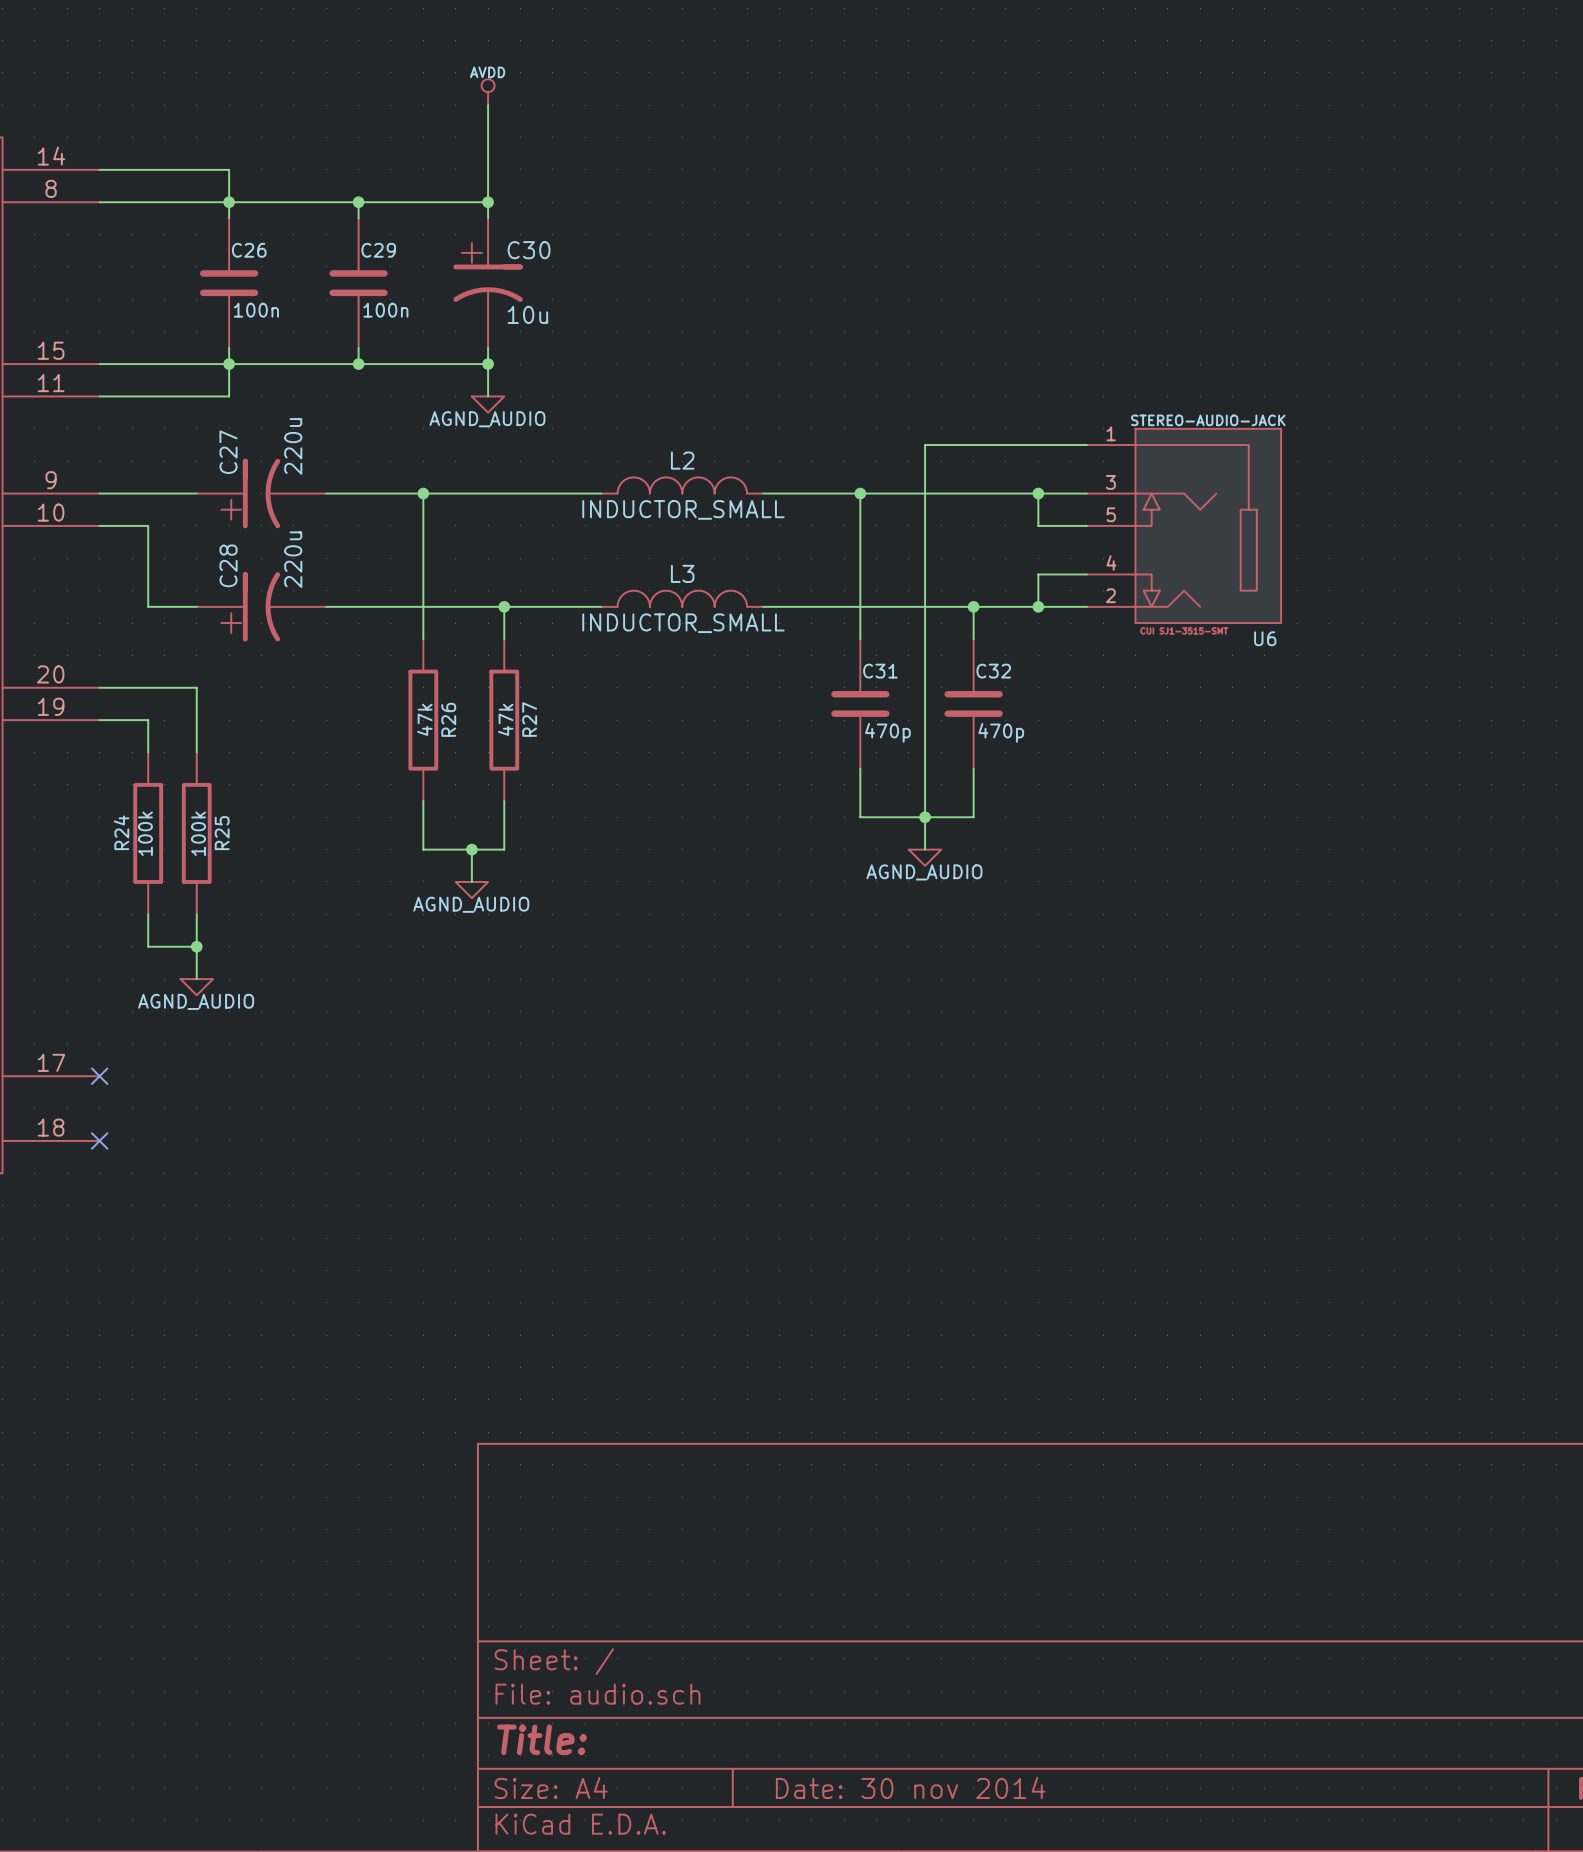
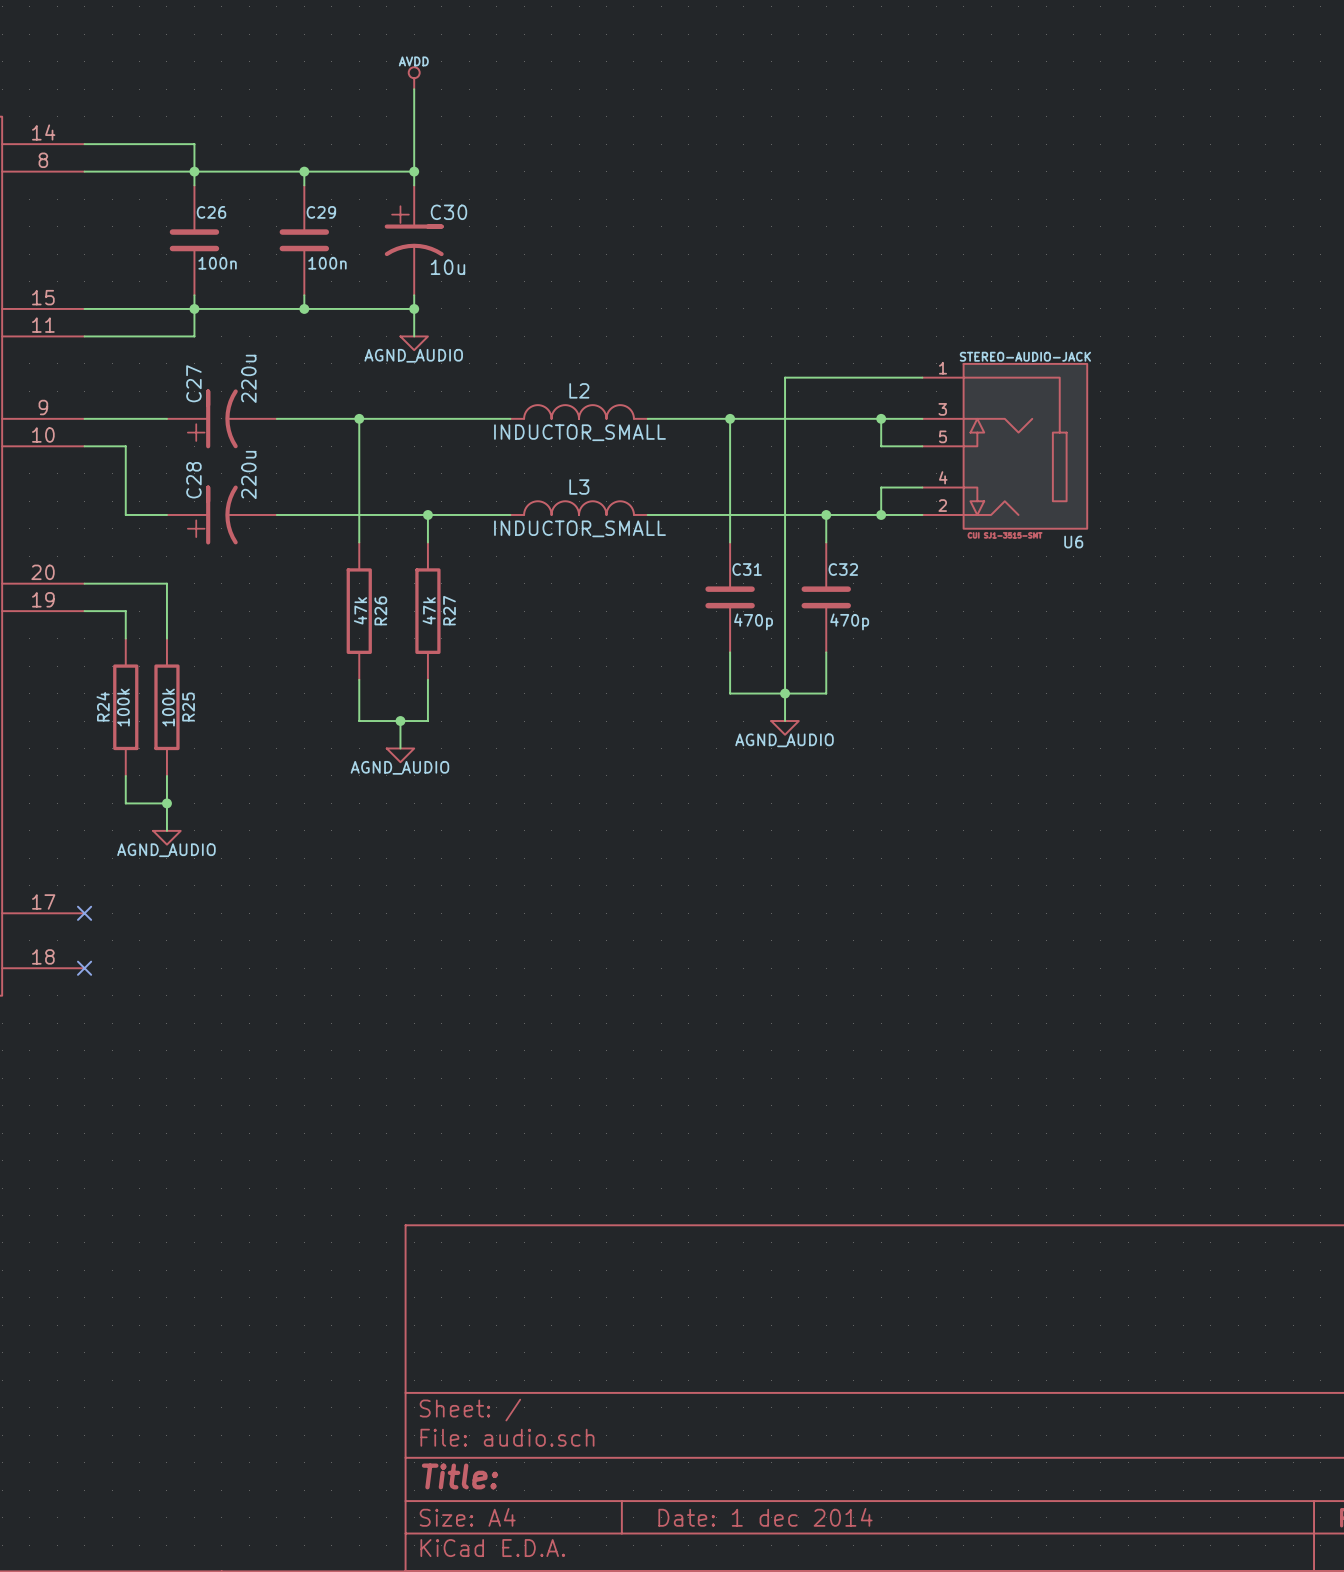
title block: Date: 30 nov 2014 (910, 1788) -> Date: 1 dec 2014 (765, 1517)

